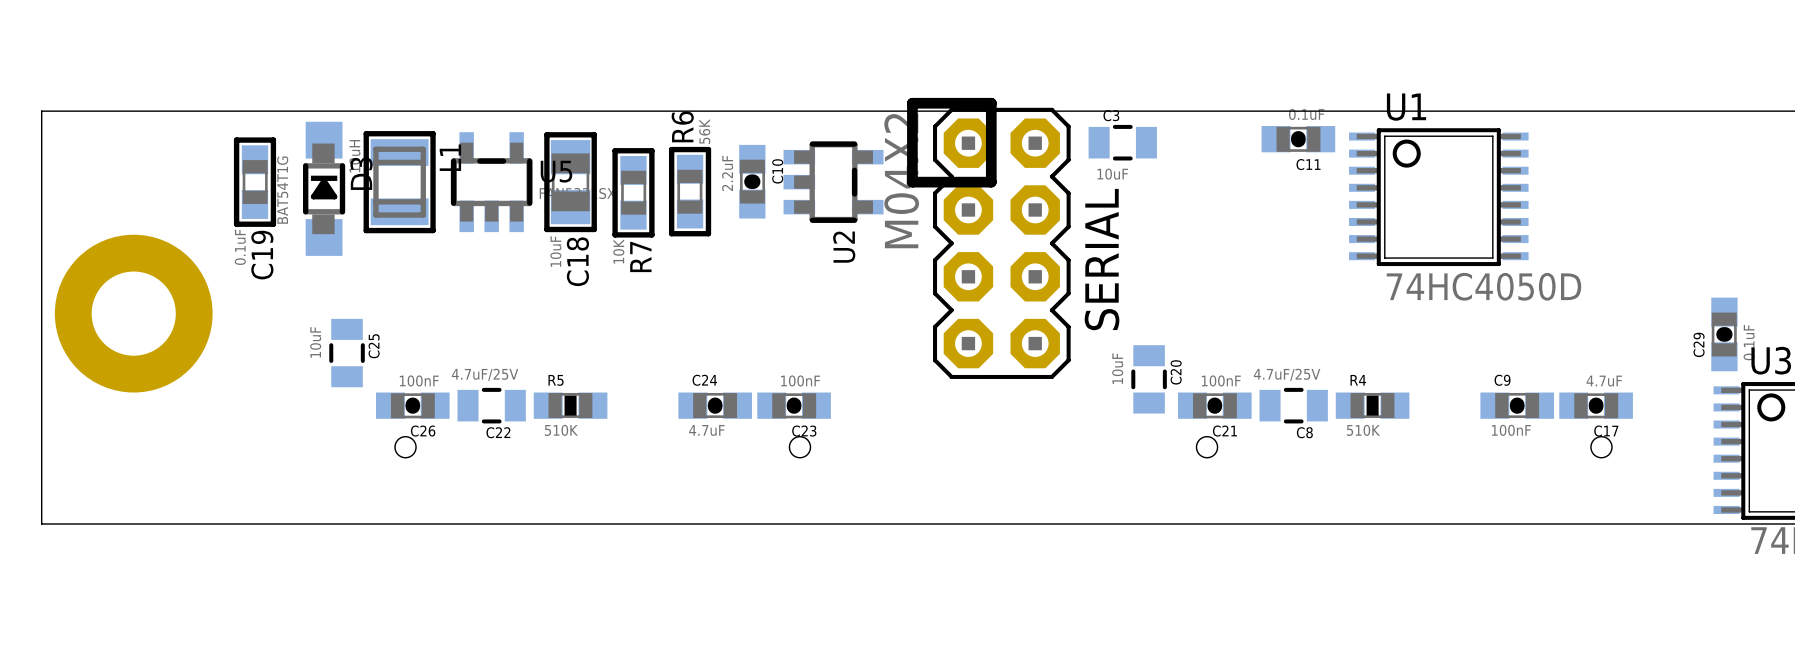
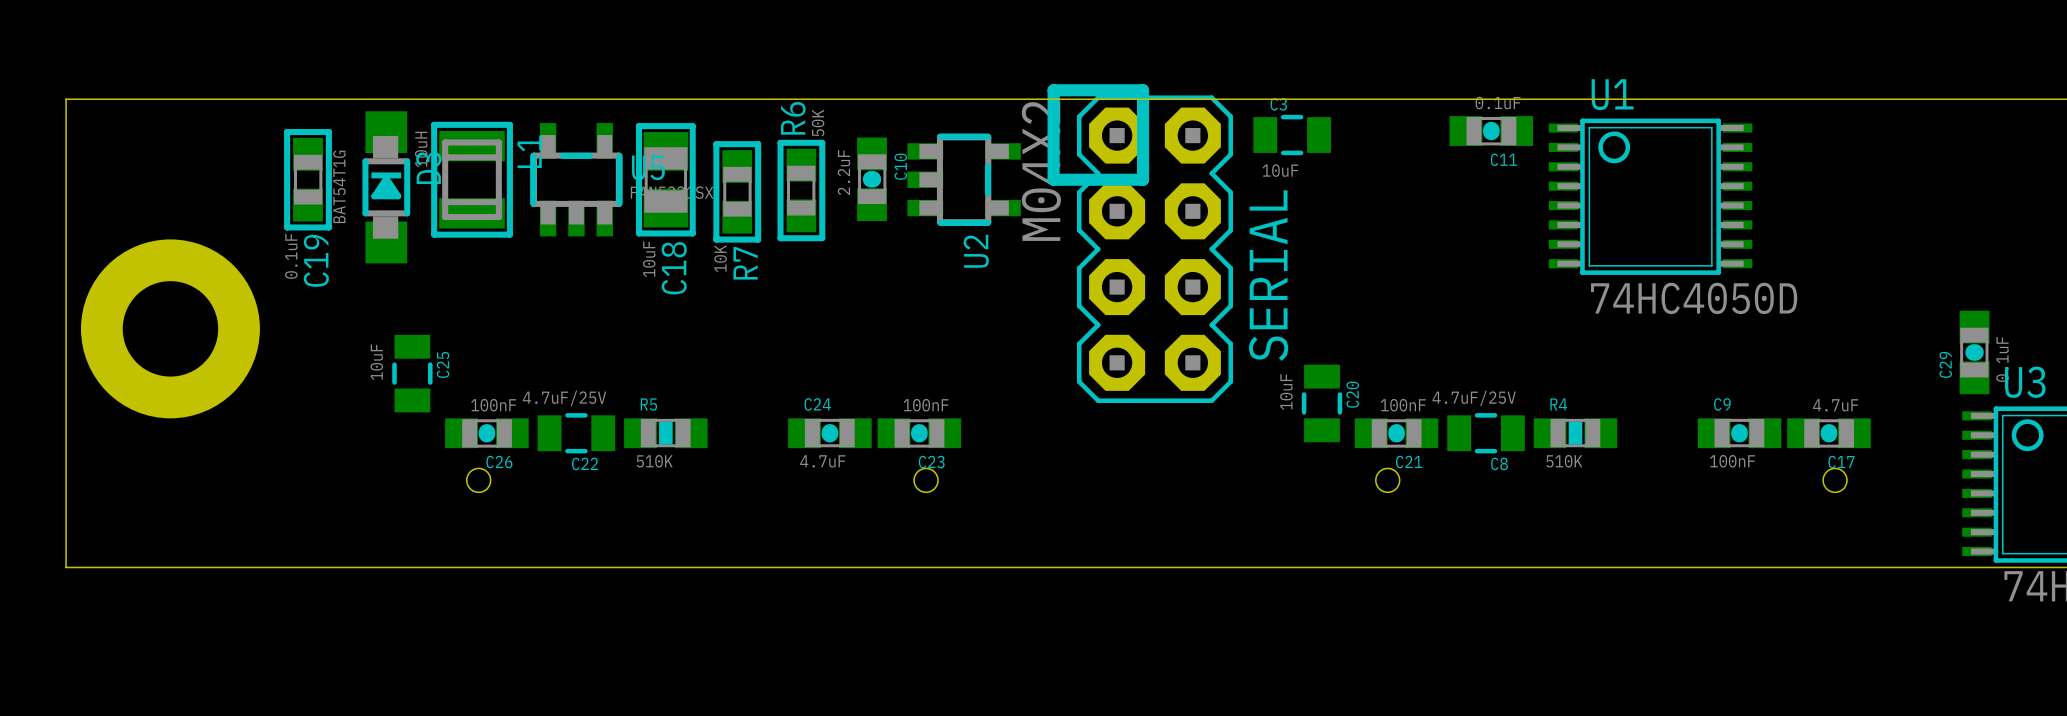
R6 value: 56K (704, 131) -> 50K (818, 123)

